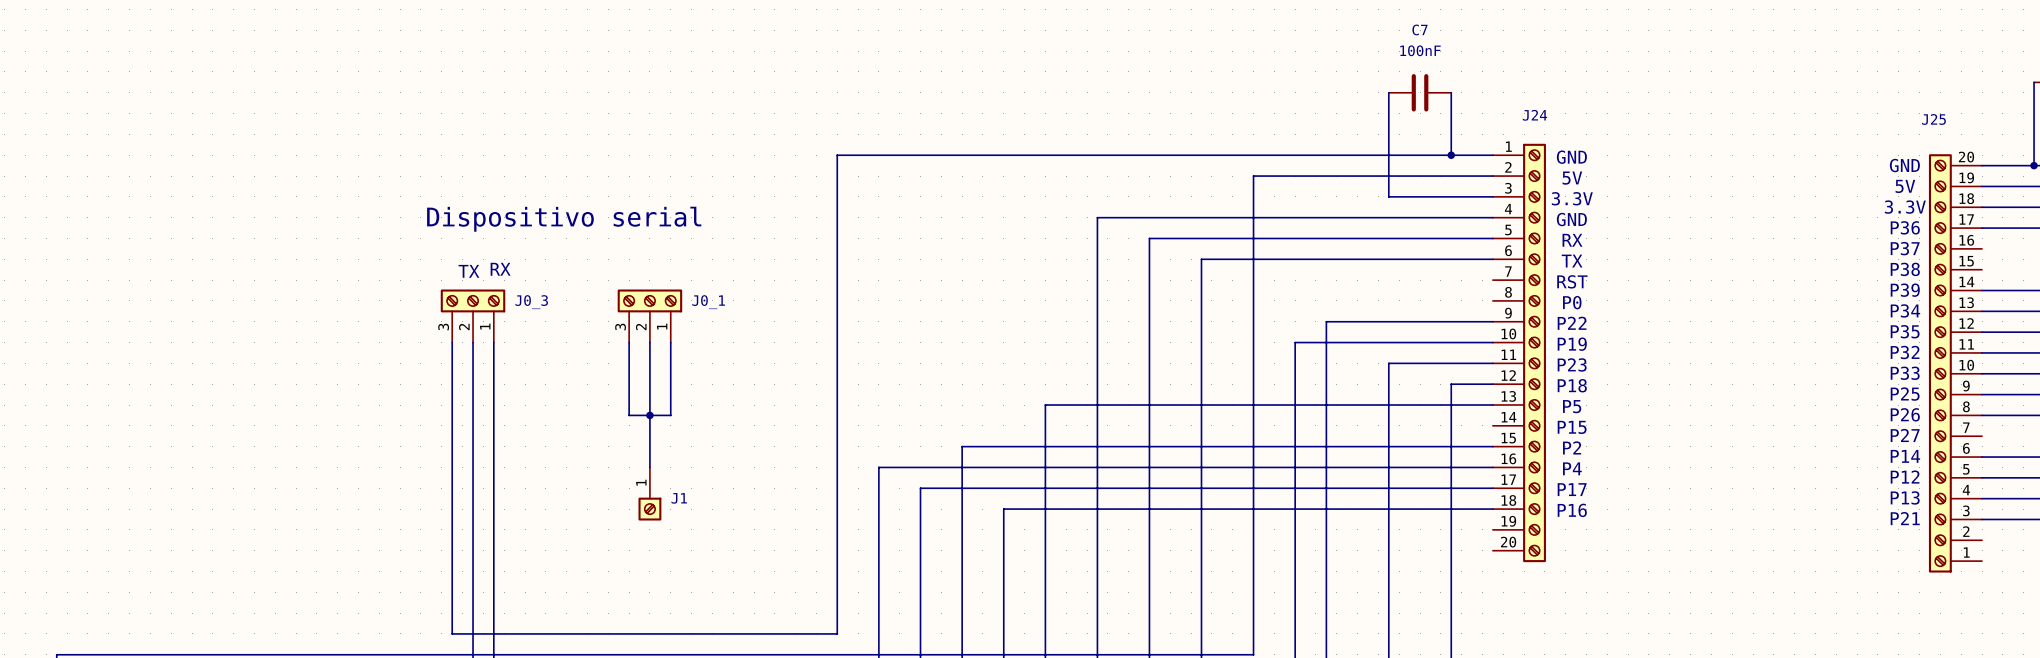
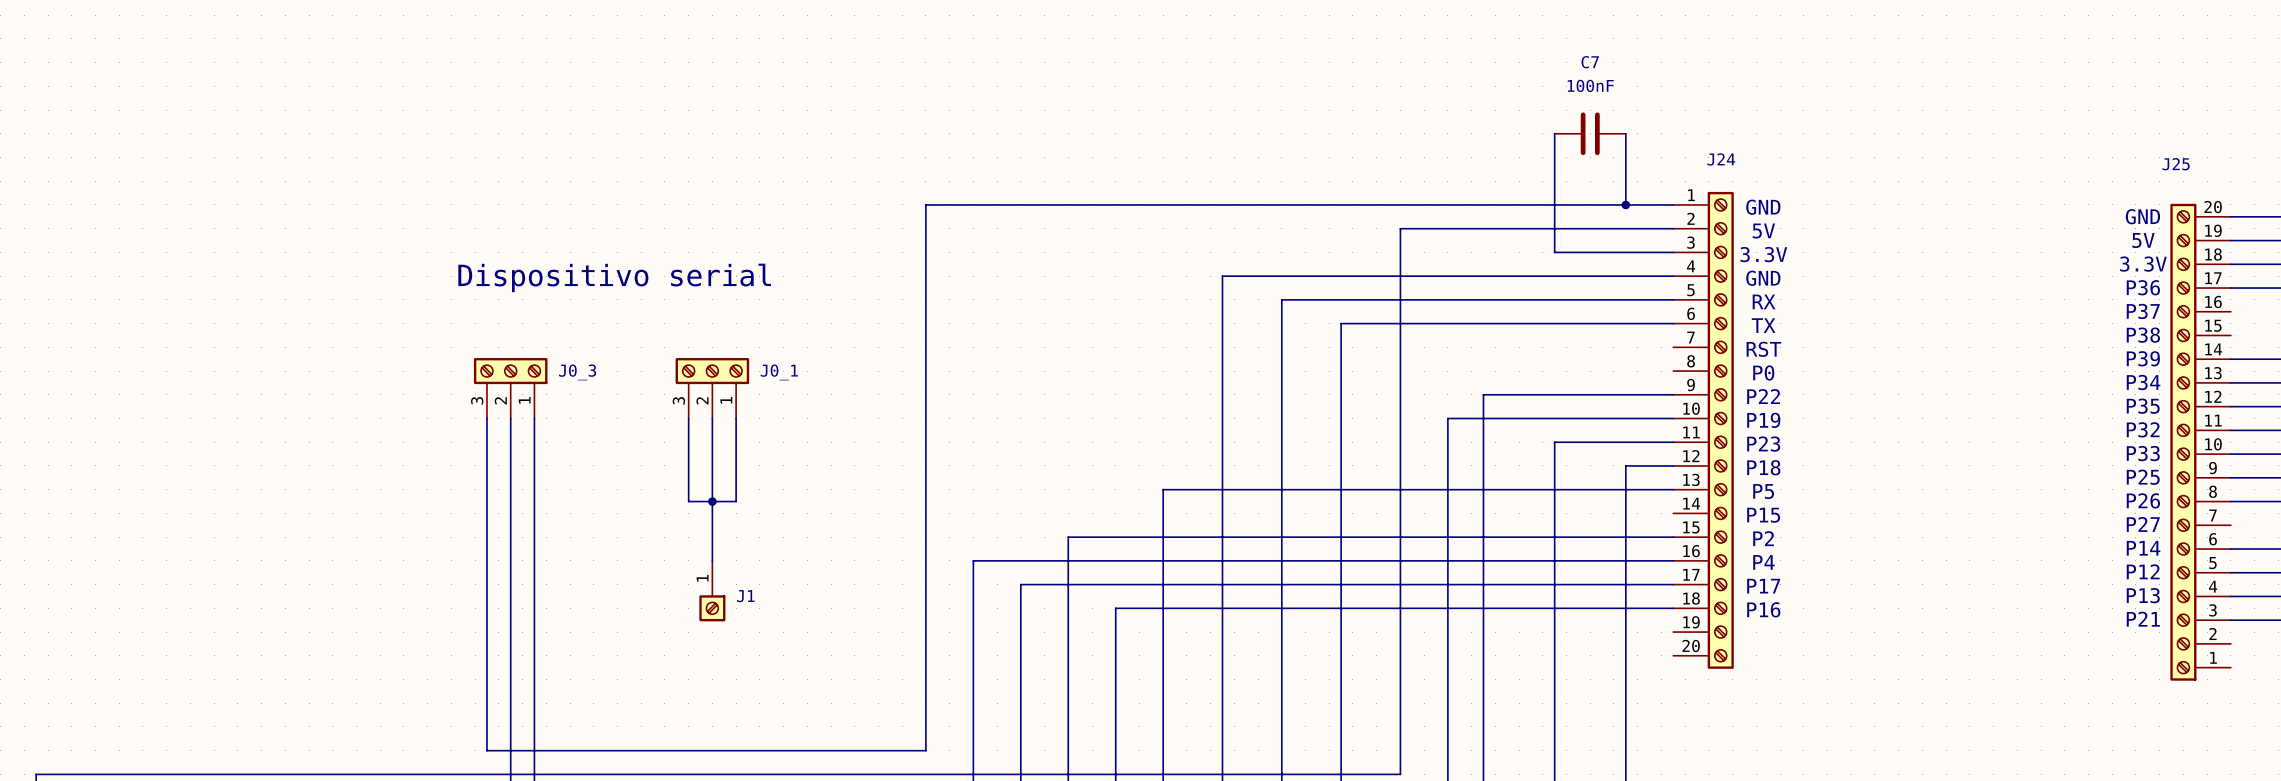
text: RX (500, 269) -> none
text: TX (468, 271) -> none

